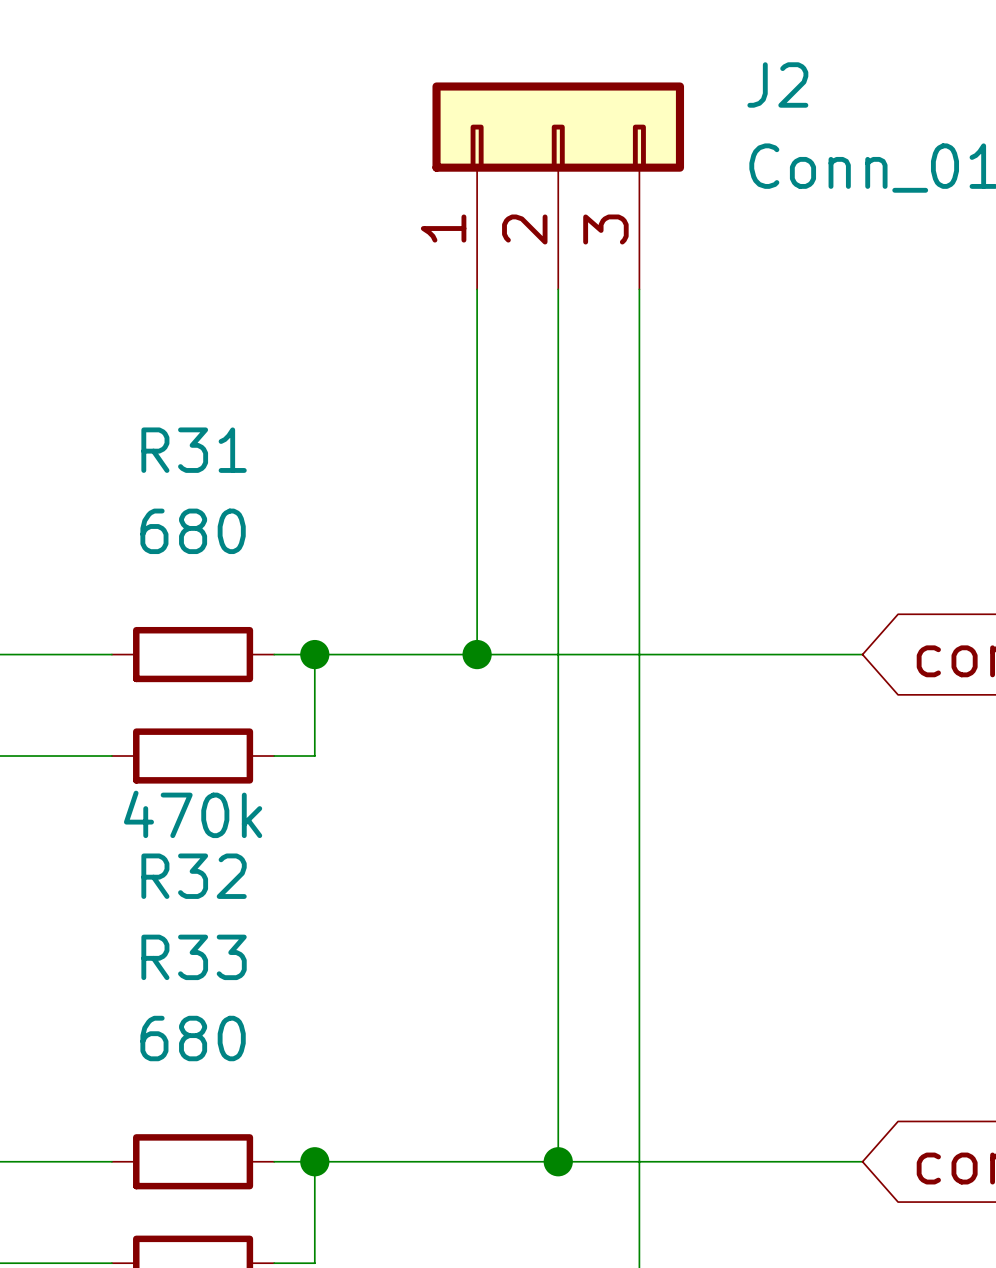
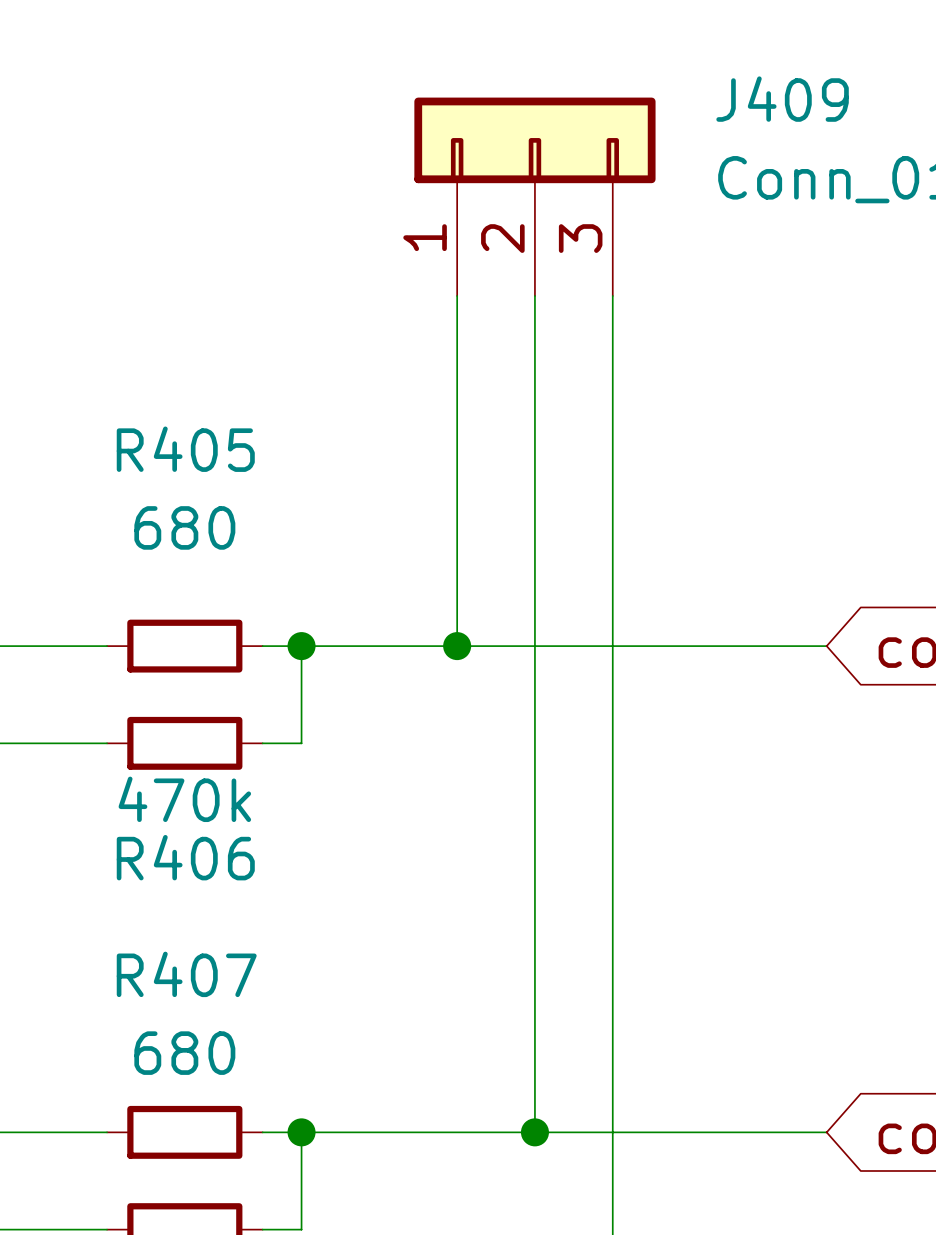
J2 name: J2 (777, 84) -> J409 (782, 99)
R31 name: R31 (194, 450) -> R405 (185, 449)
R32 name: R32 (194, 876) -> R406 (185, 857)
R33 name: R33 (194, 957) -> R407 (186, 974)
R33 value position: 680 (193, 1038) -> 680 (184, 1053)

